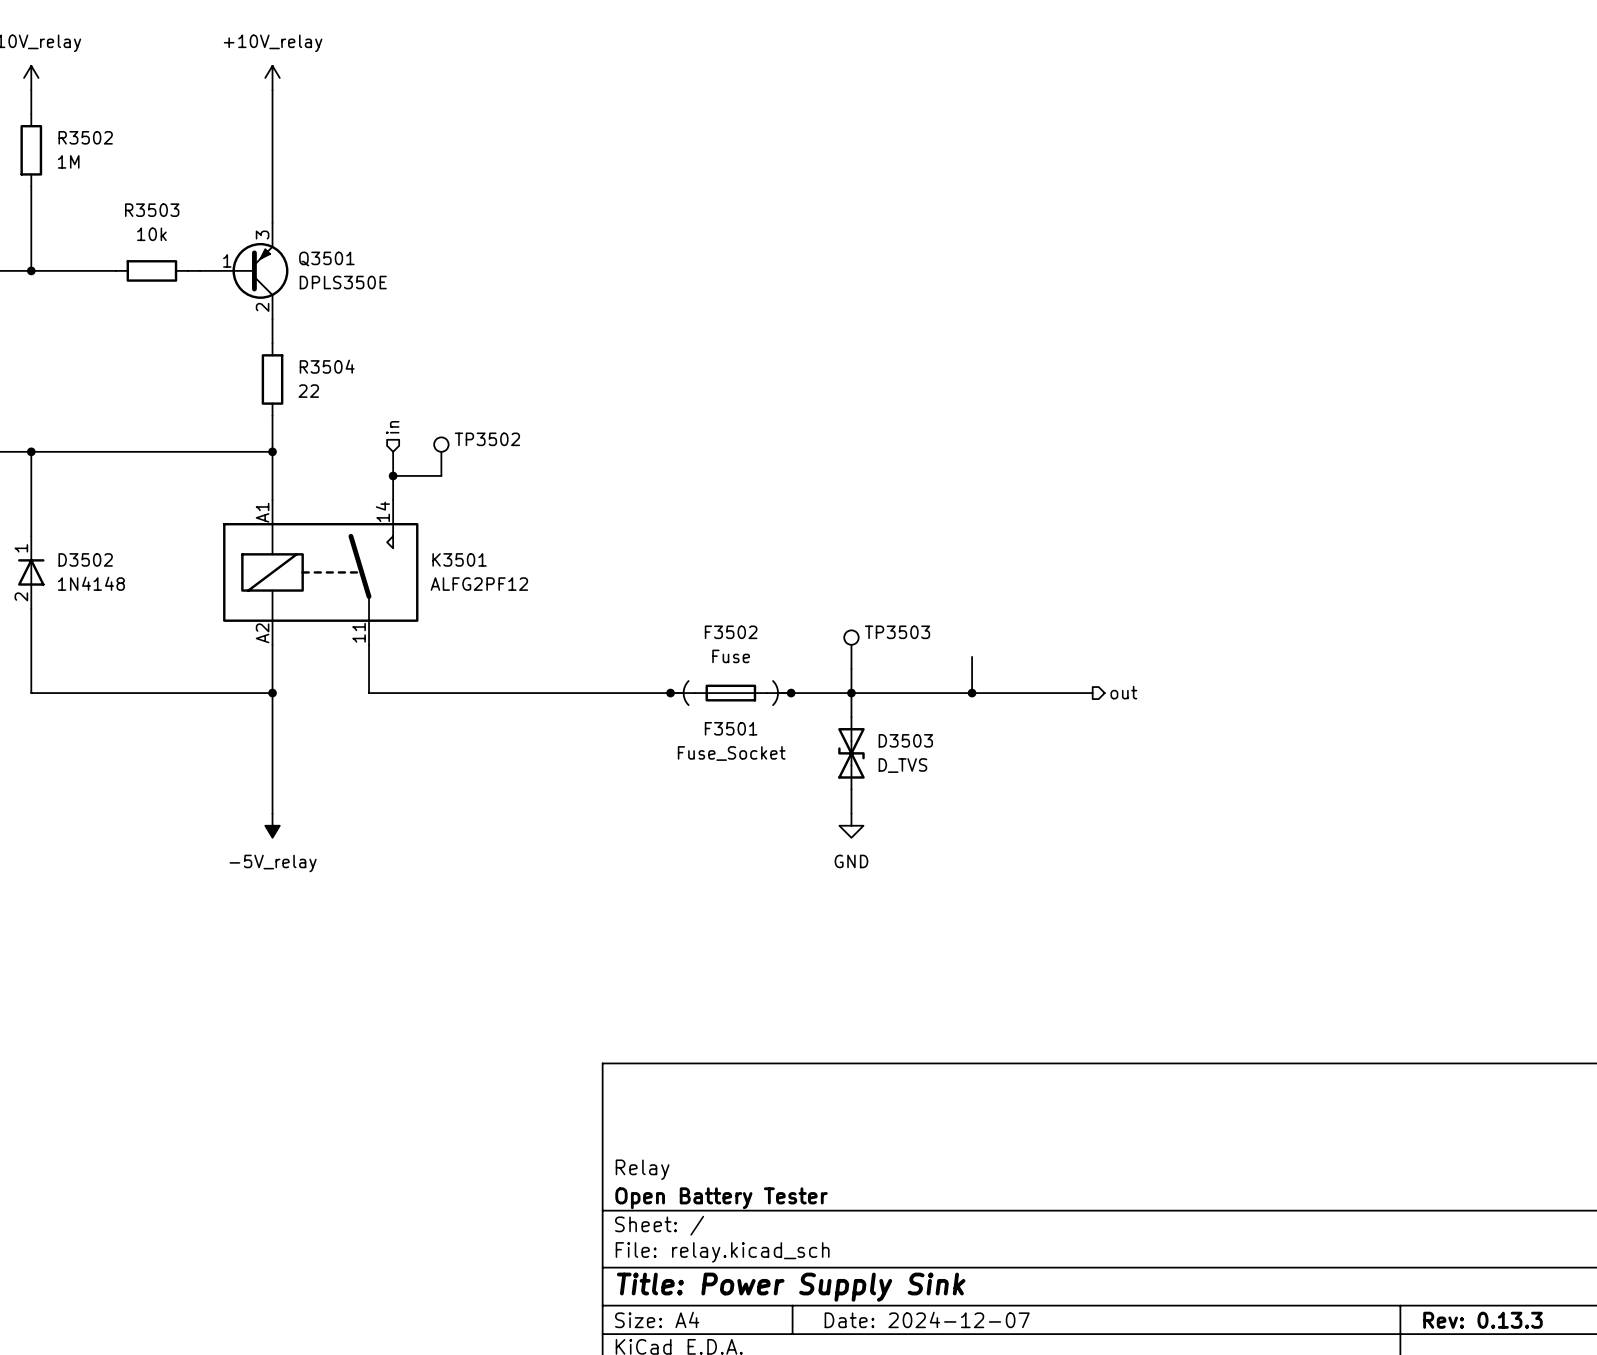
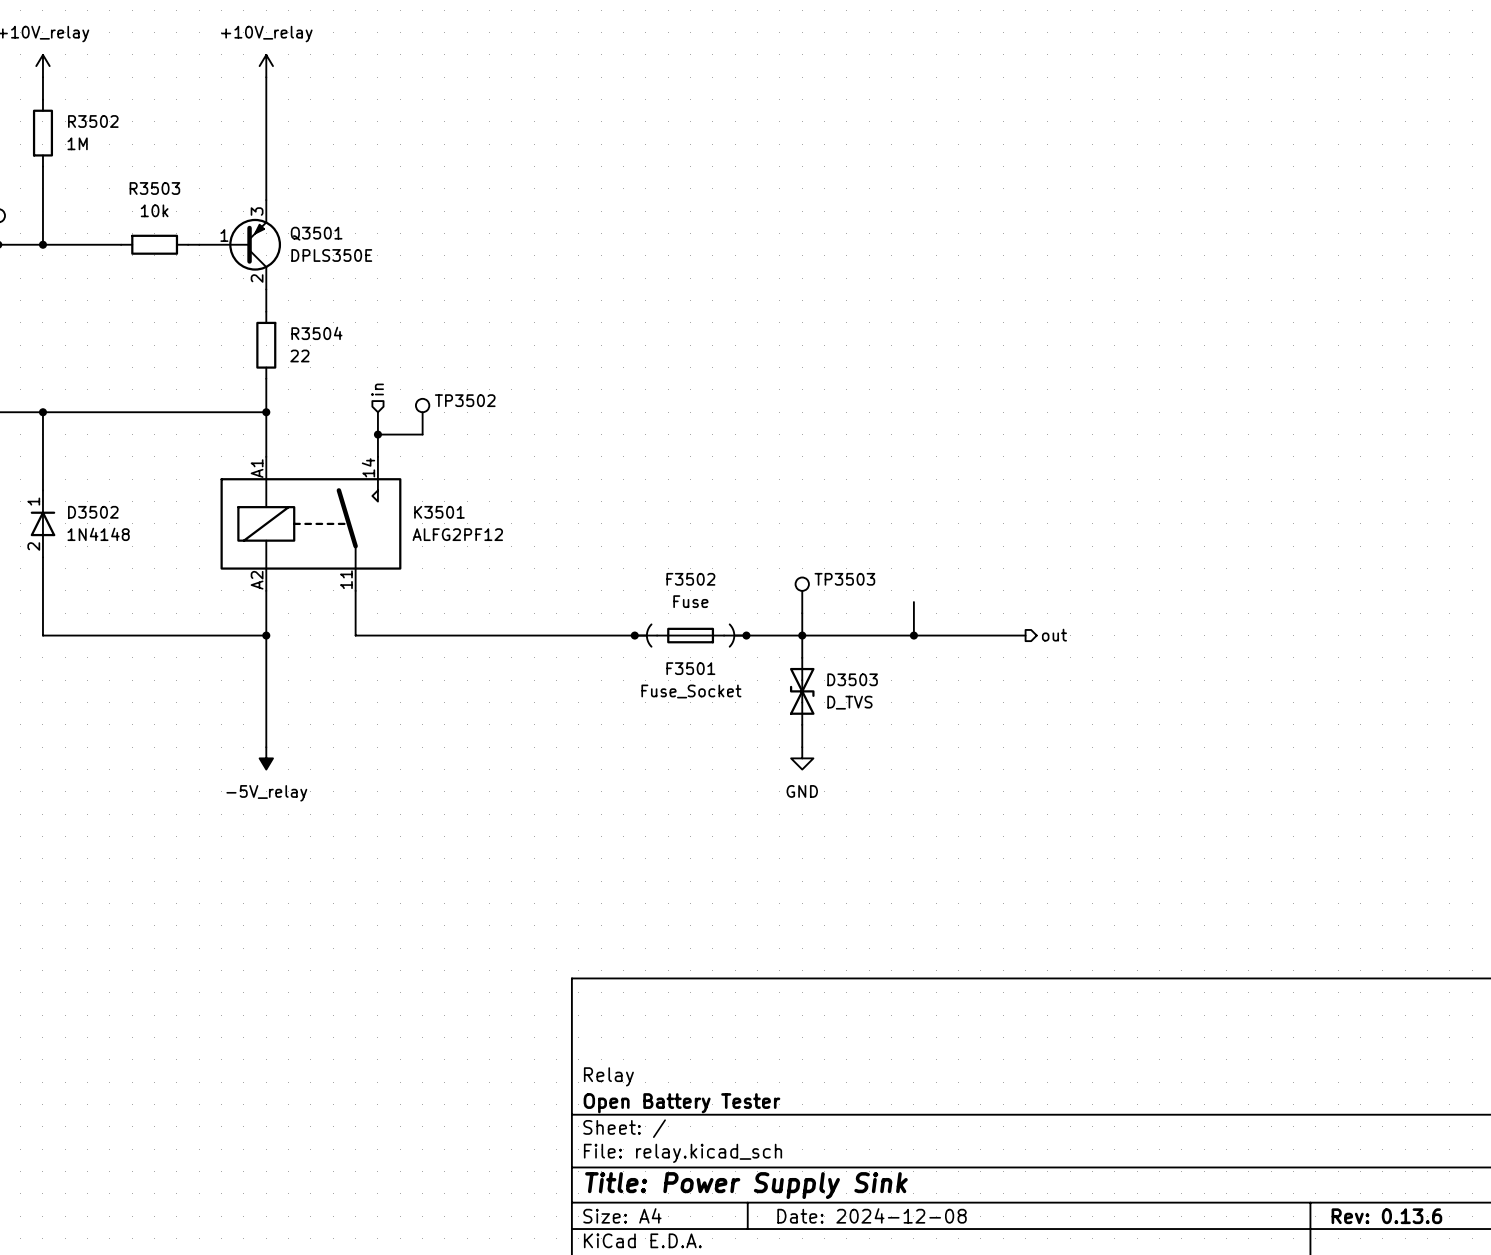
title block: Date: 2024-12-07 (927, 1319) -> Date: 2024-12-08 (872, 1215)
title block: Rev: 0.13.3 (1482, 1320) -> Rev: 0.13.6 (1386, 1216)

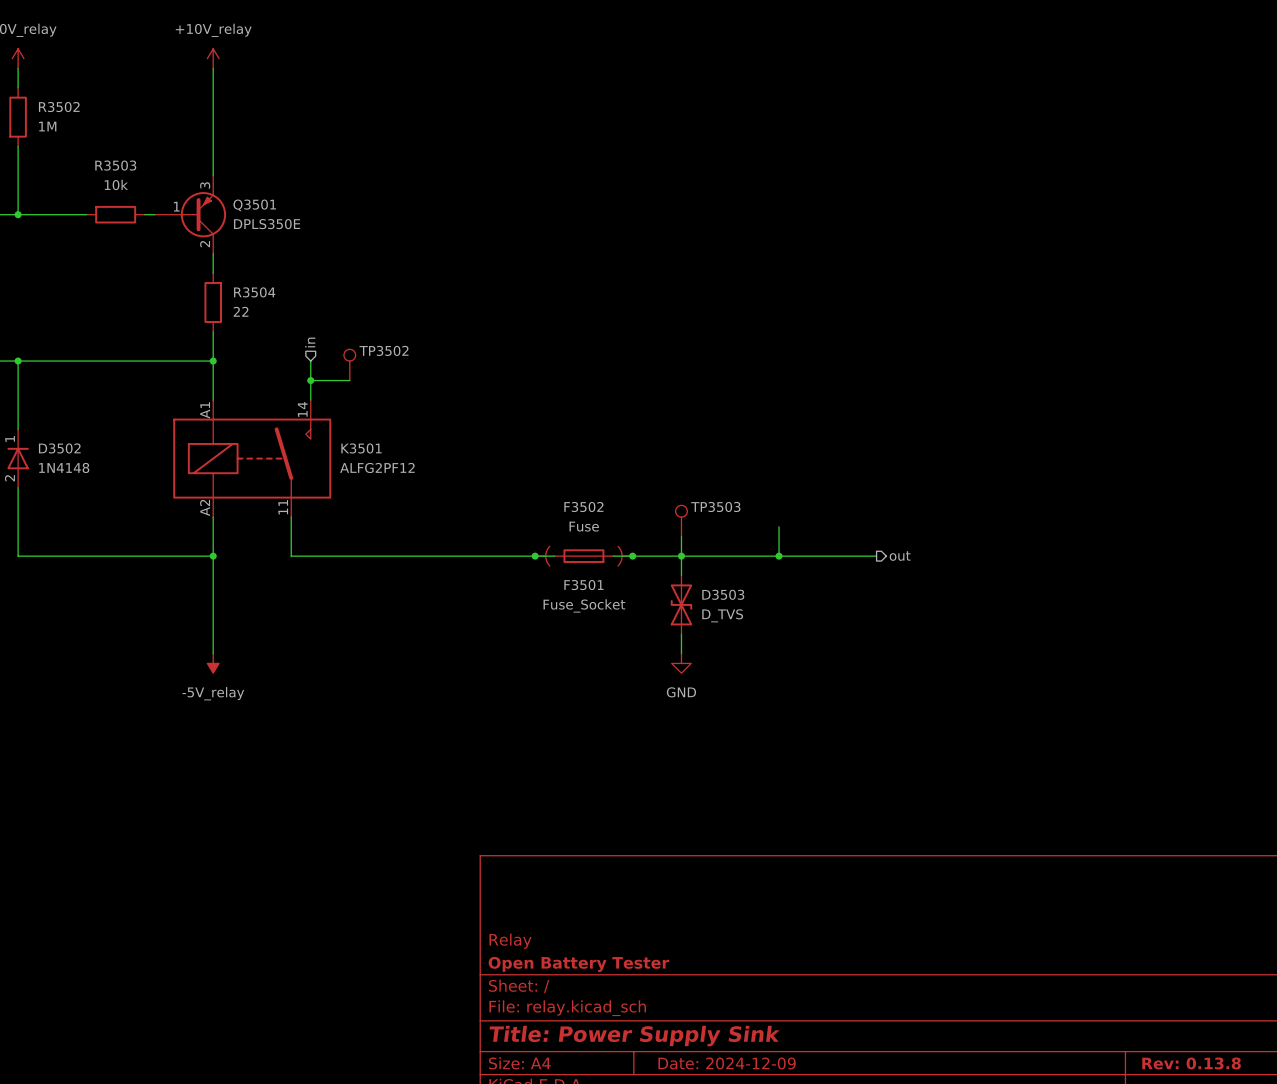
title block: Date: 2024-12-08 (872, 1215) -> Date: 2024-12-09 (727, 1063)
title block: Rev: 0.13.6 (1386, 1216) -> Rev: 0.13.8 (1191, 1063)

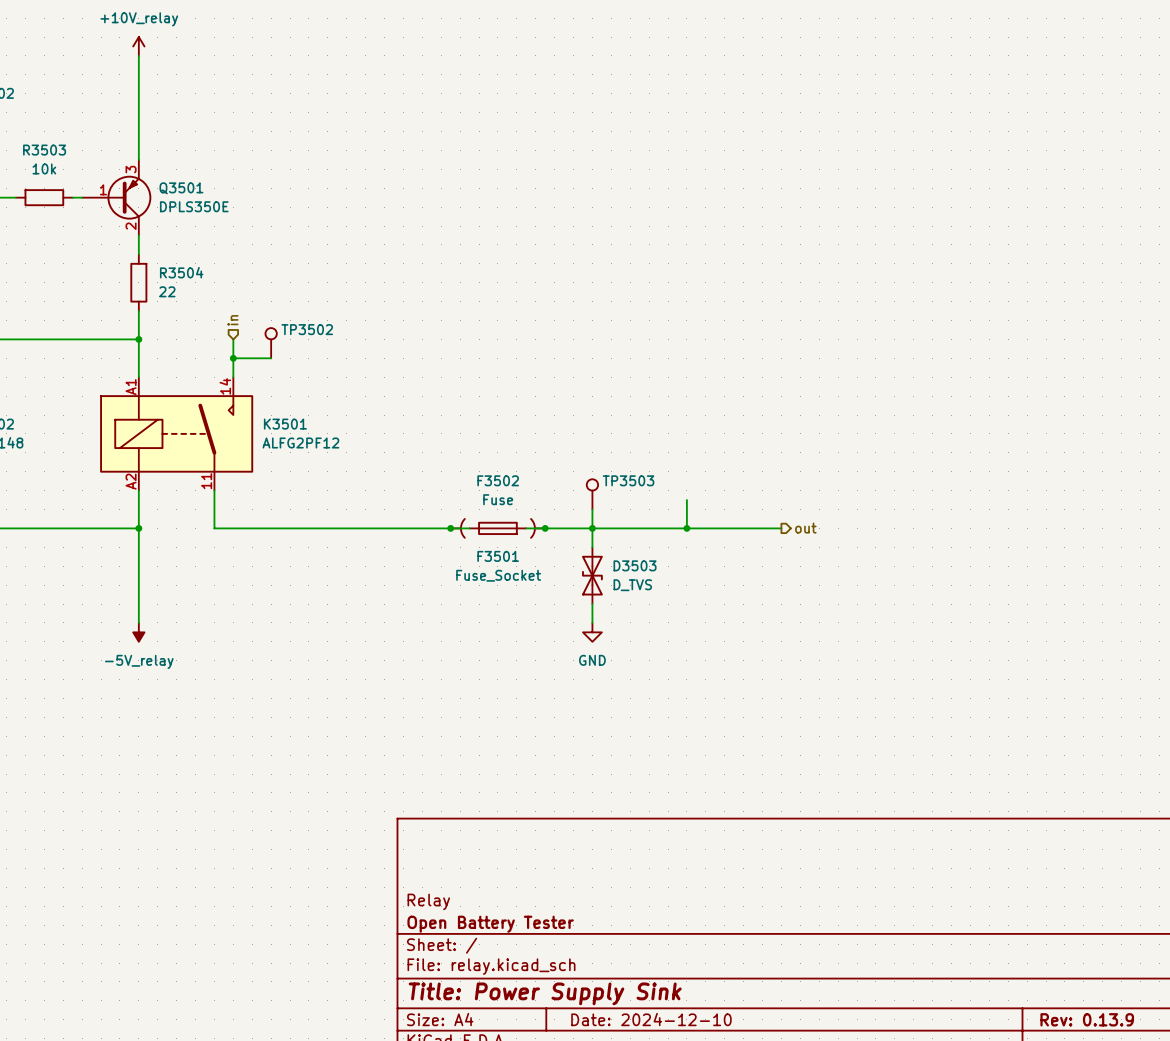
title block: Date: 2024-12-09 (727, 1063) -> Date: 2024-12-10 (651, 1019)
title block: Rev: 0.13.8 (1191, 1063) -> Rev: 0.13.9 (1087, 1019)

